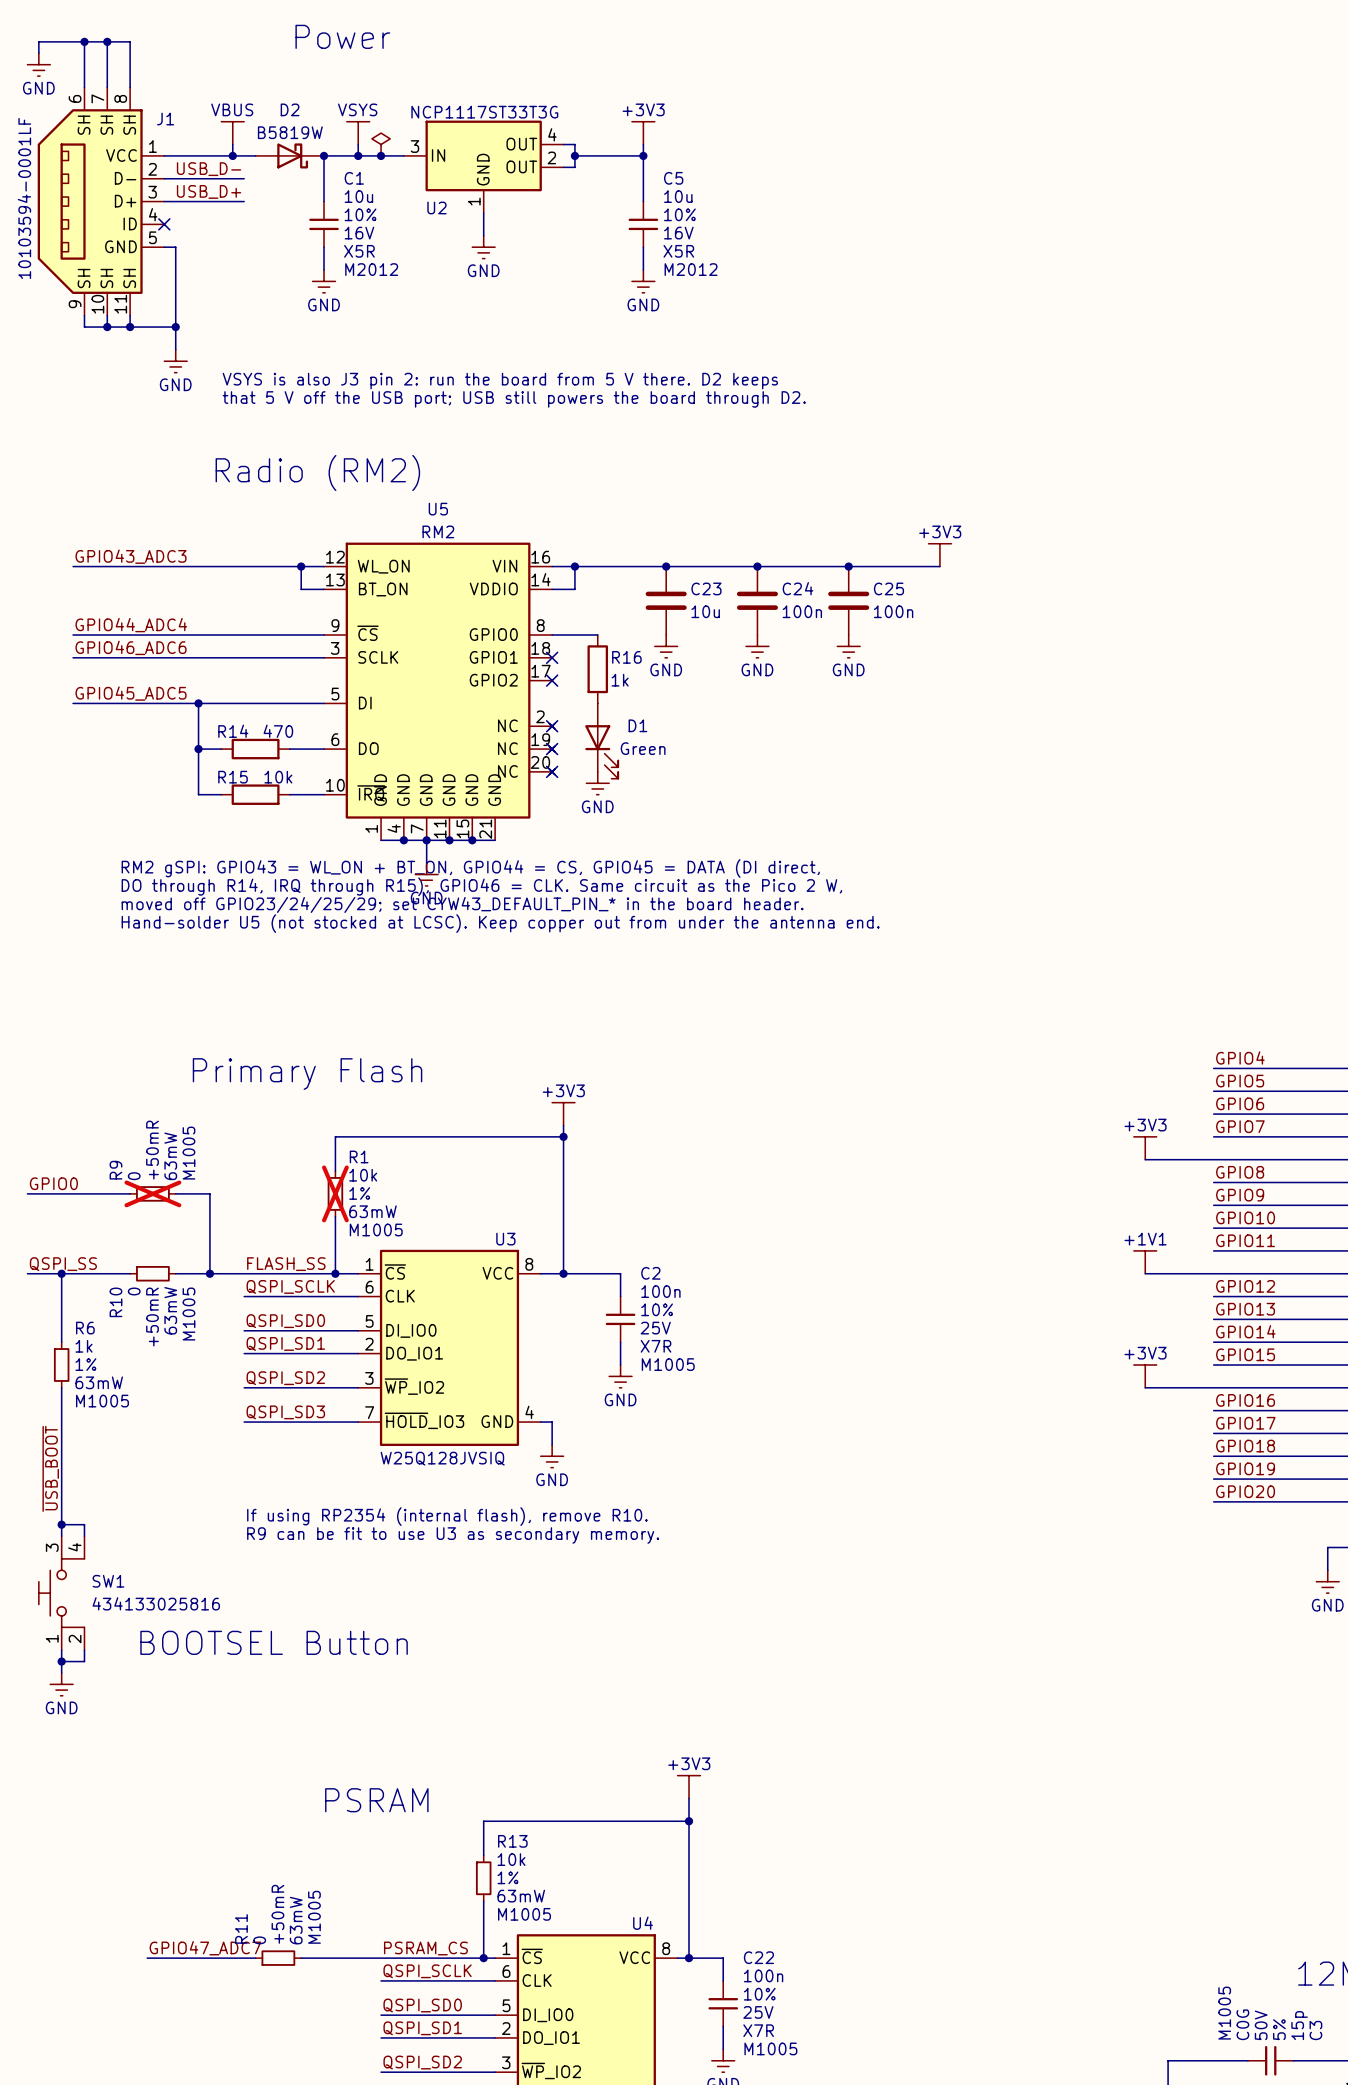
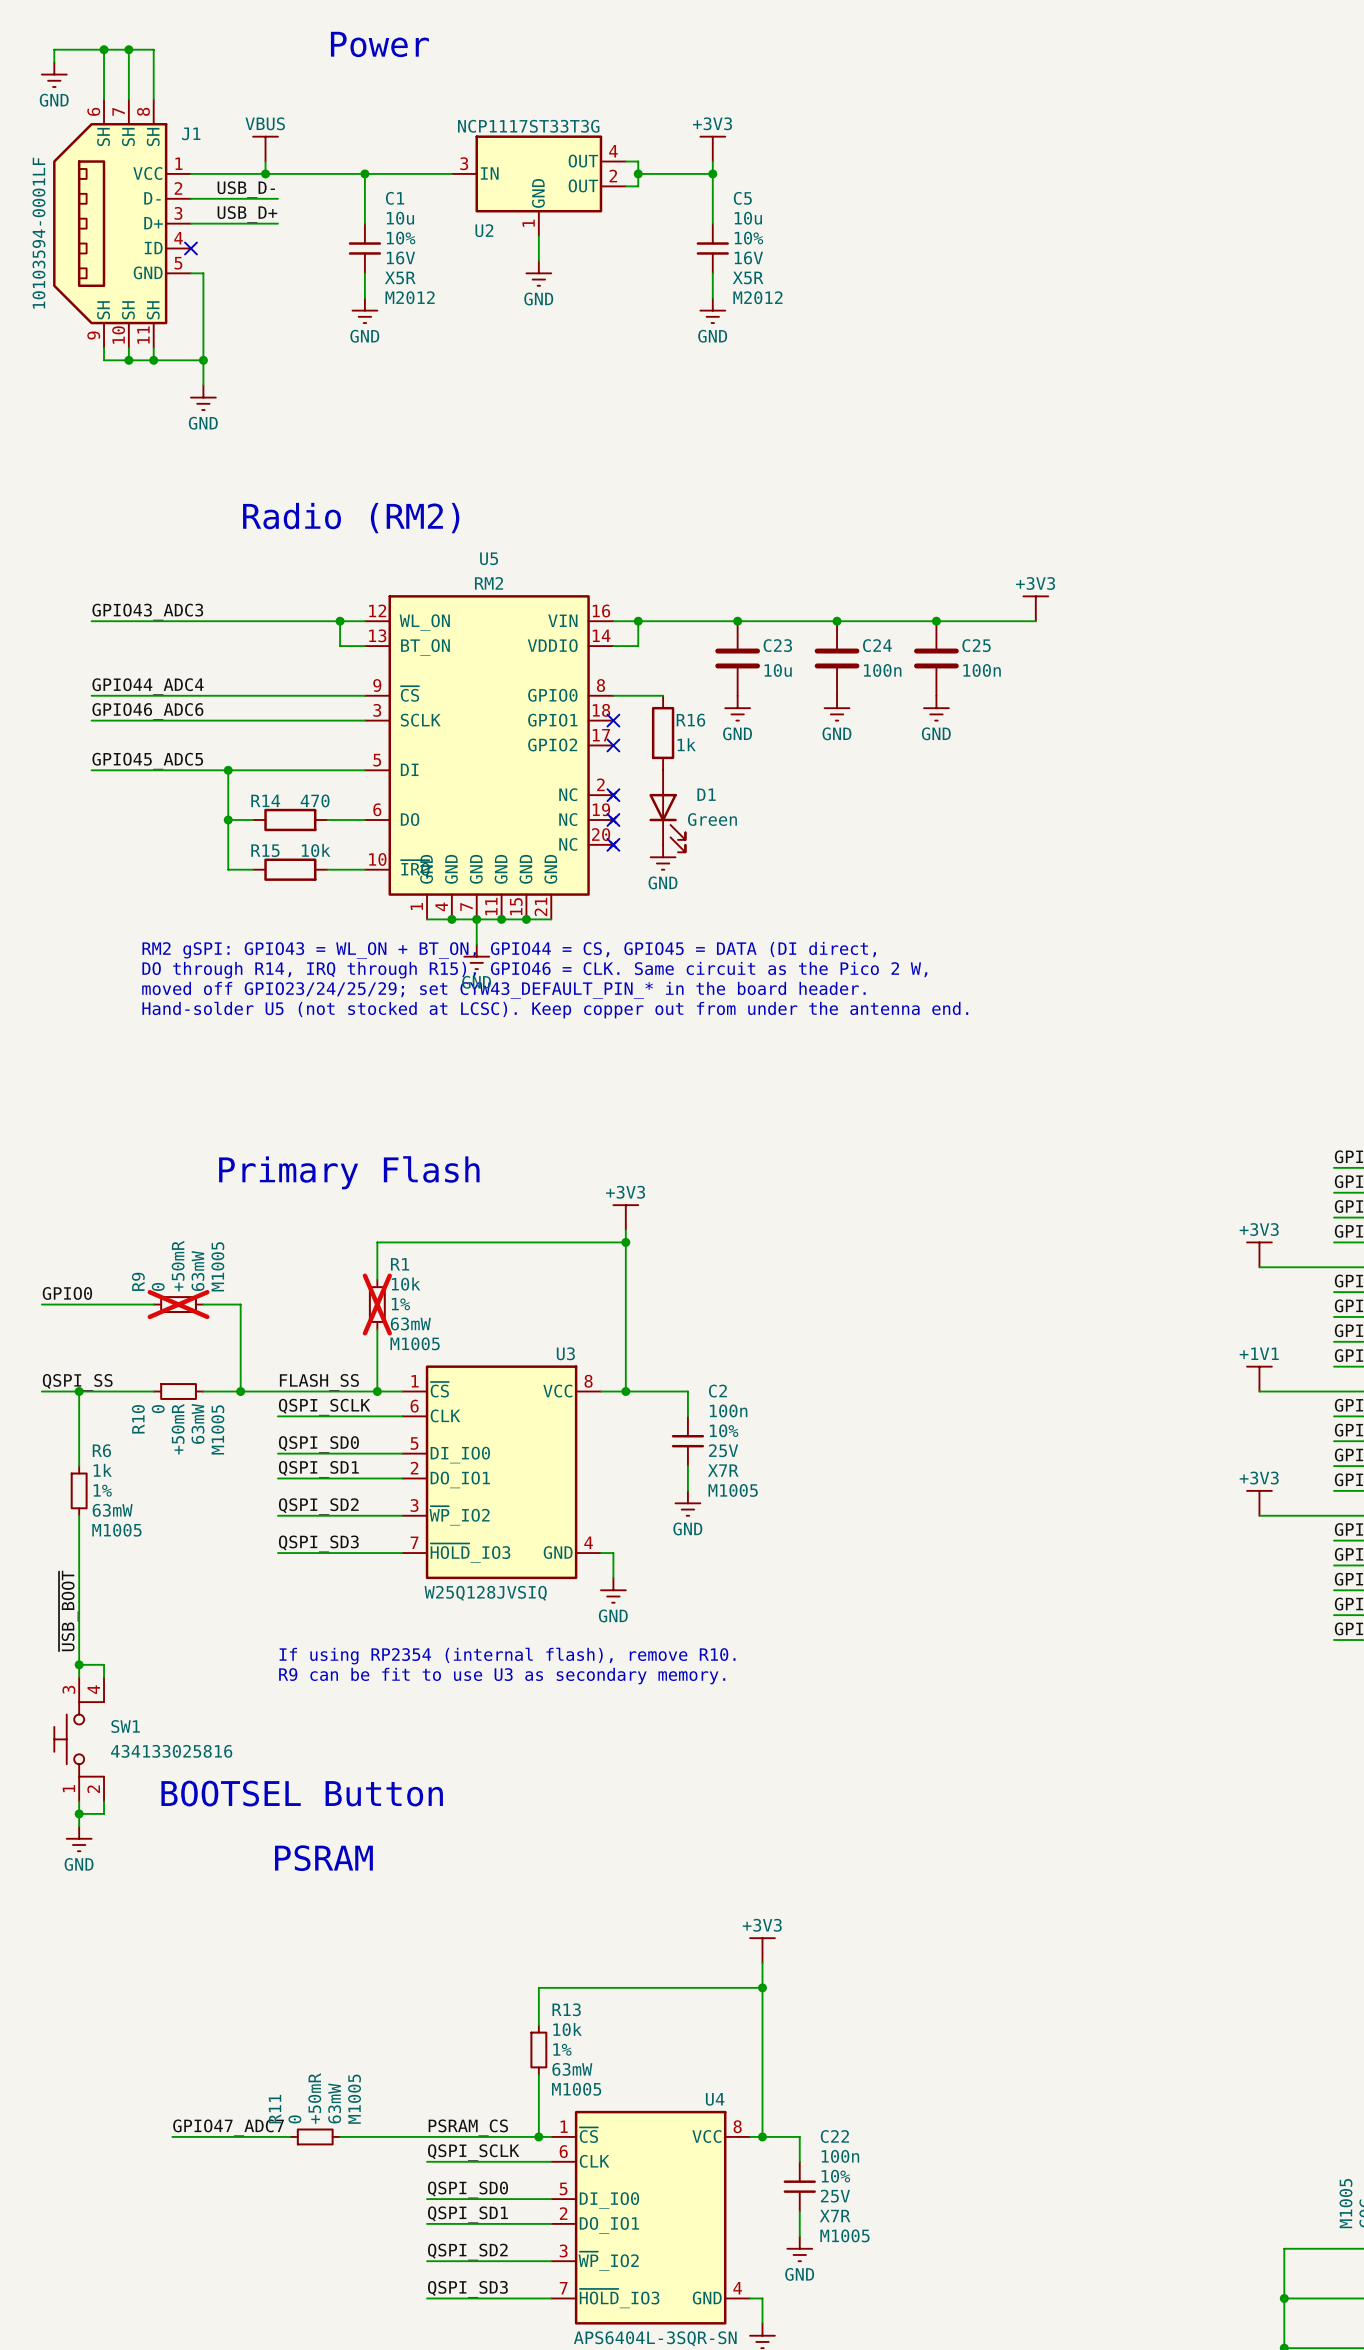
power symbol: VSYS (358, 133) -> none
wire: (358, 144) (358, 155) -> none
power symbol: (381, 144) -> none
D2: B5819W (289, 155) -> none
junction: (358, 155) -> none
junction: (381, 155) -> none
text: VSYS is also J3 pin 2: run the board from 5 V there. D2 keeps (500, 381) -> none
text: that 5 V off the USB port; USB still powers the board through D2. (514, 399) -> none
text position: PSRAM (376, 1800) -> PSRAM (323, 1858)

